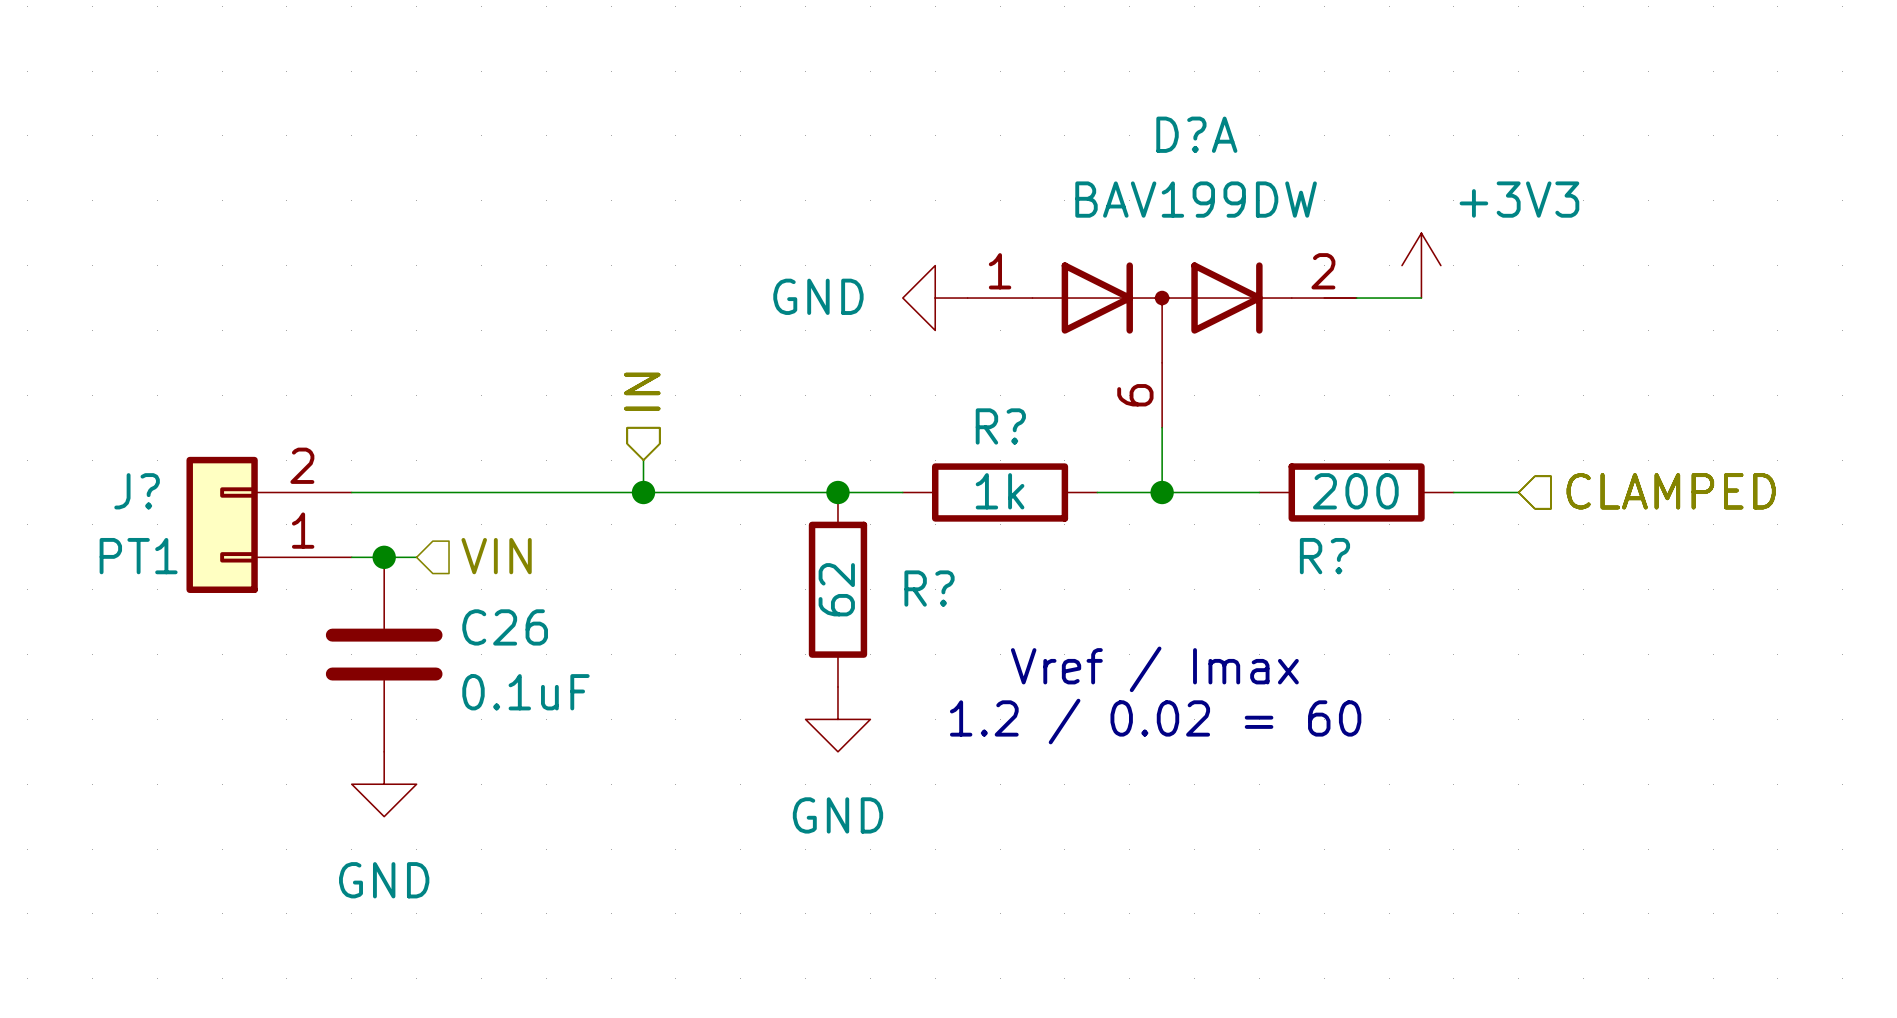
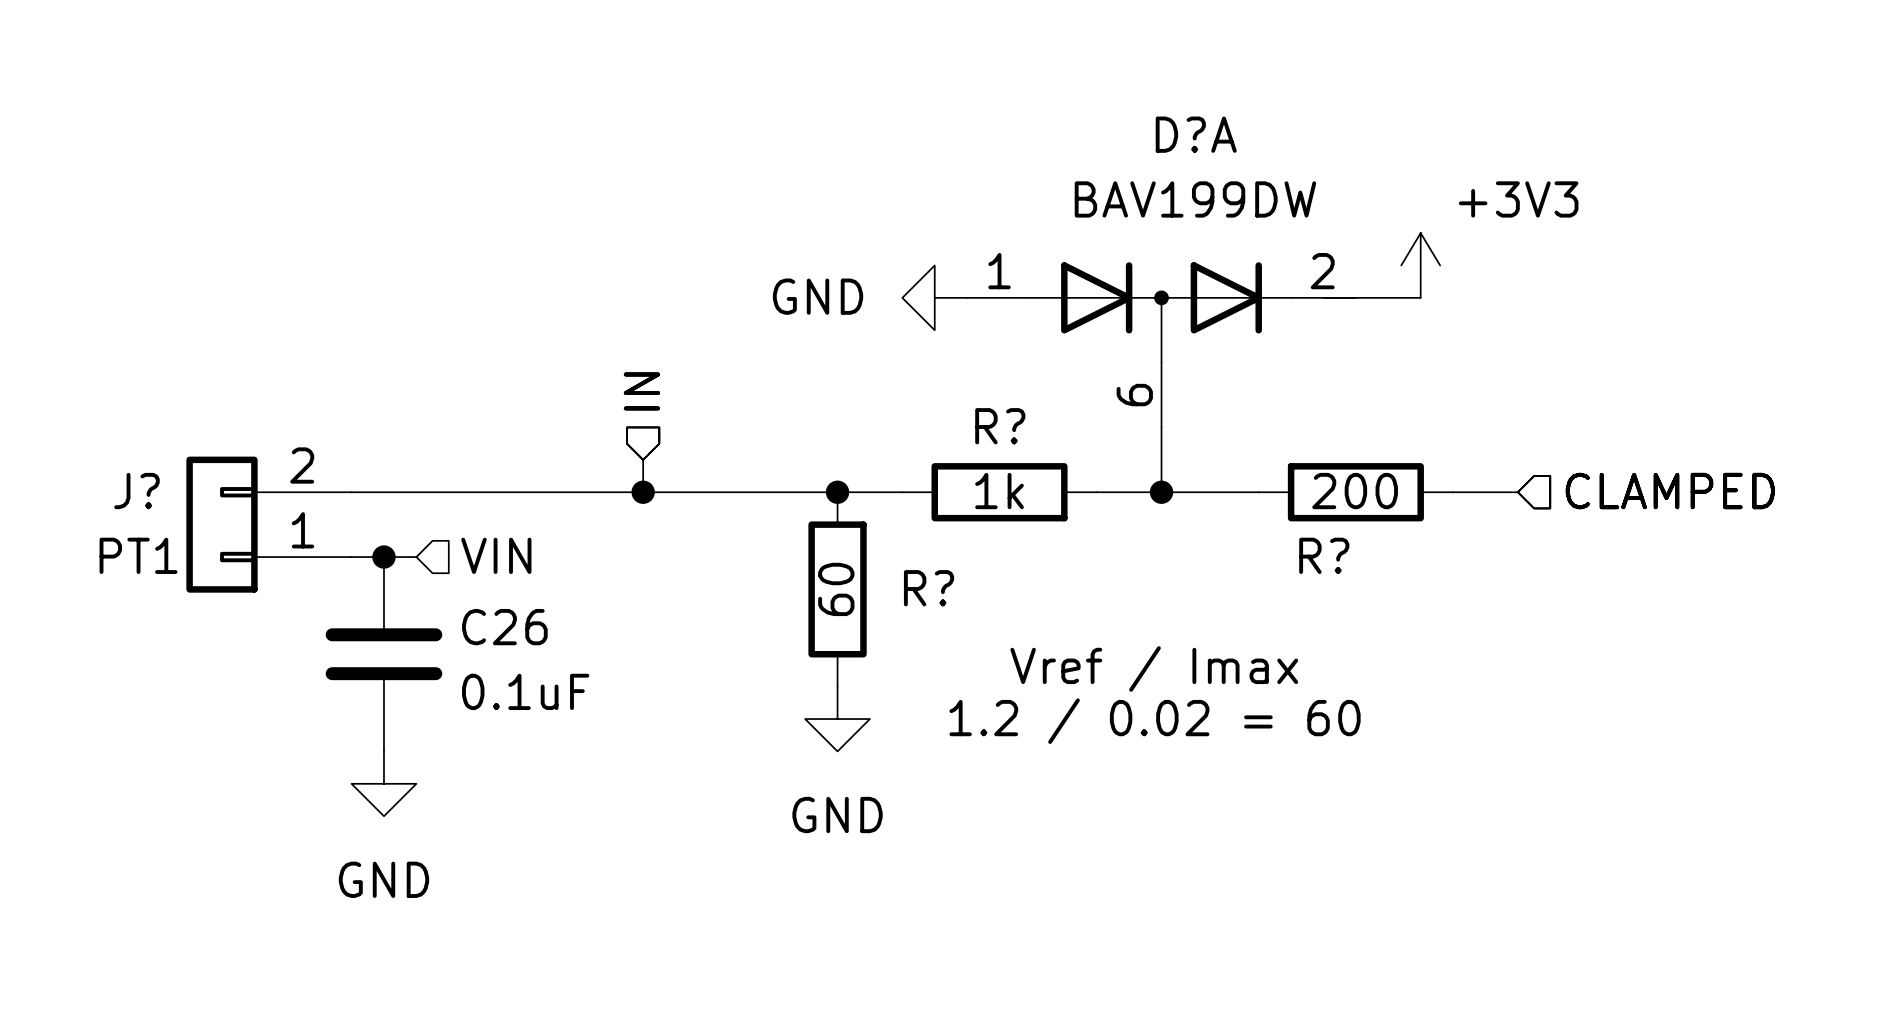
R? value: 62 (836, 589) -> 60 (836, 589)

